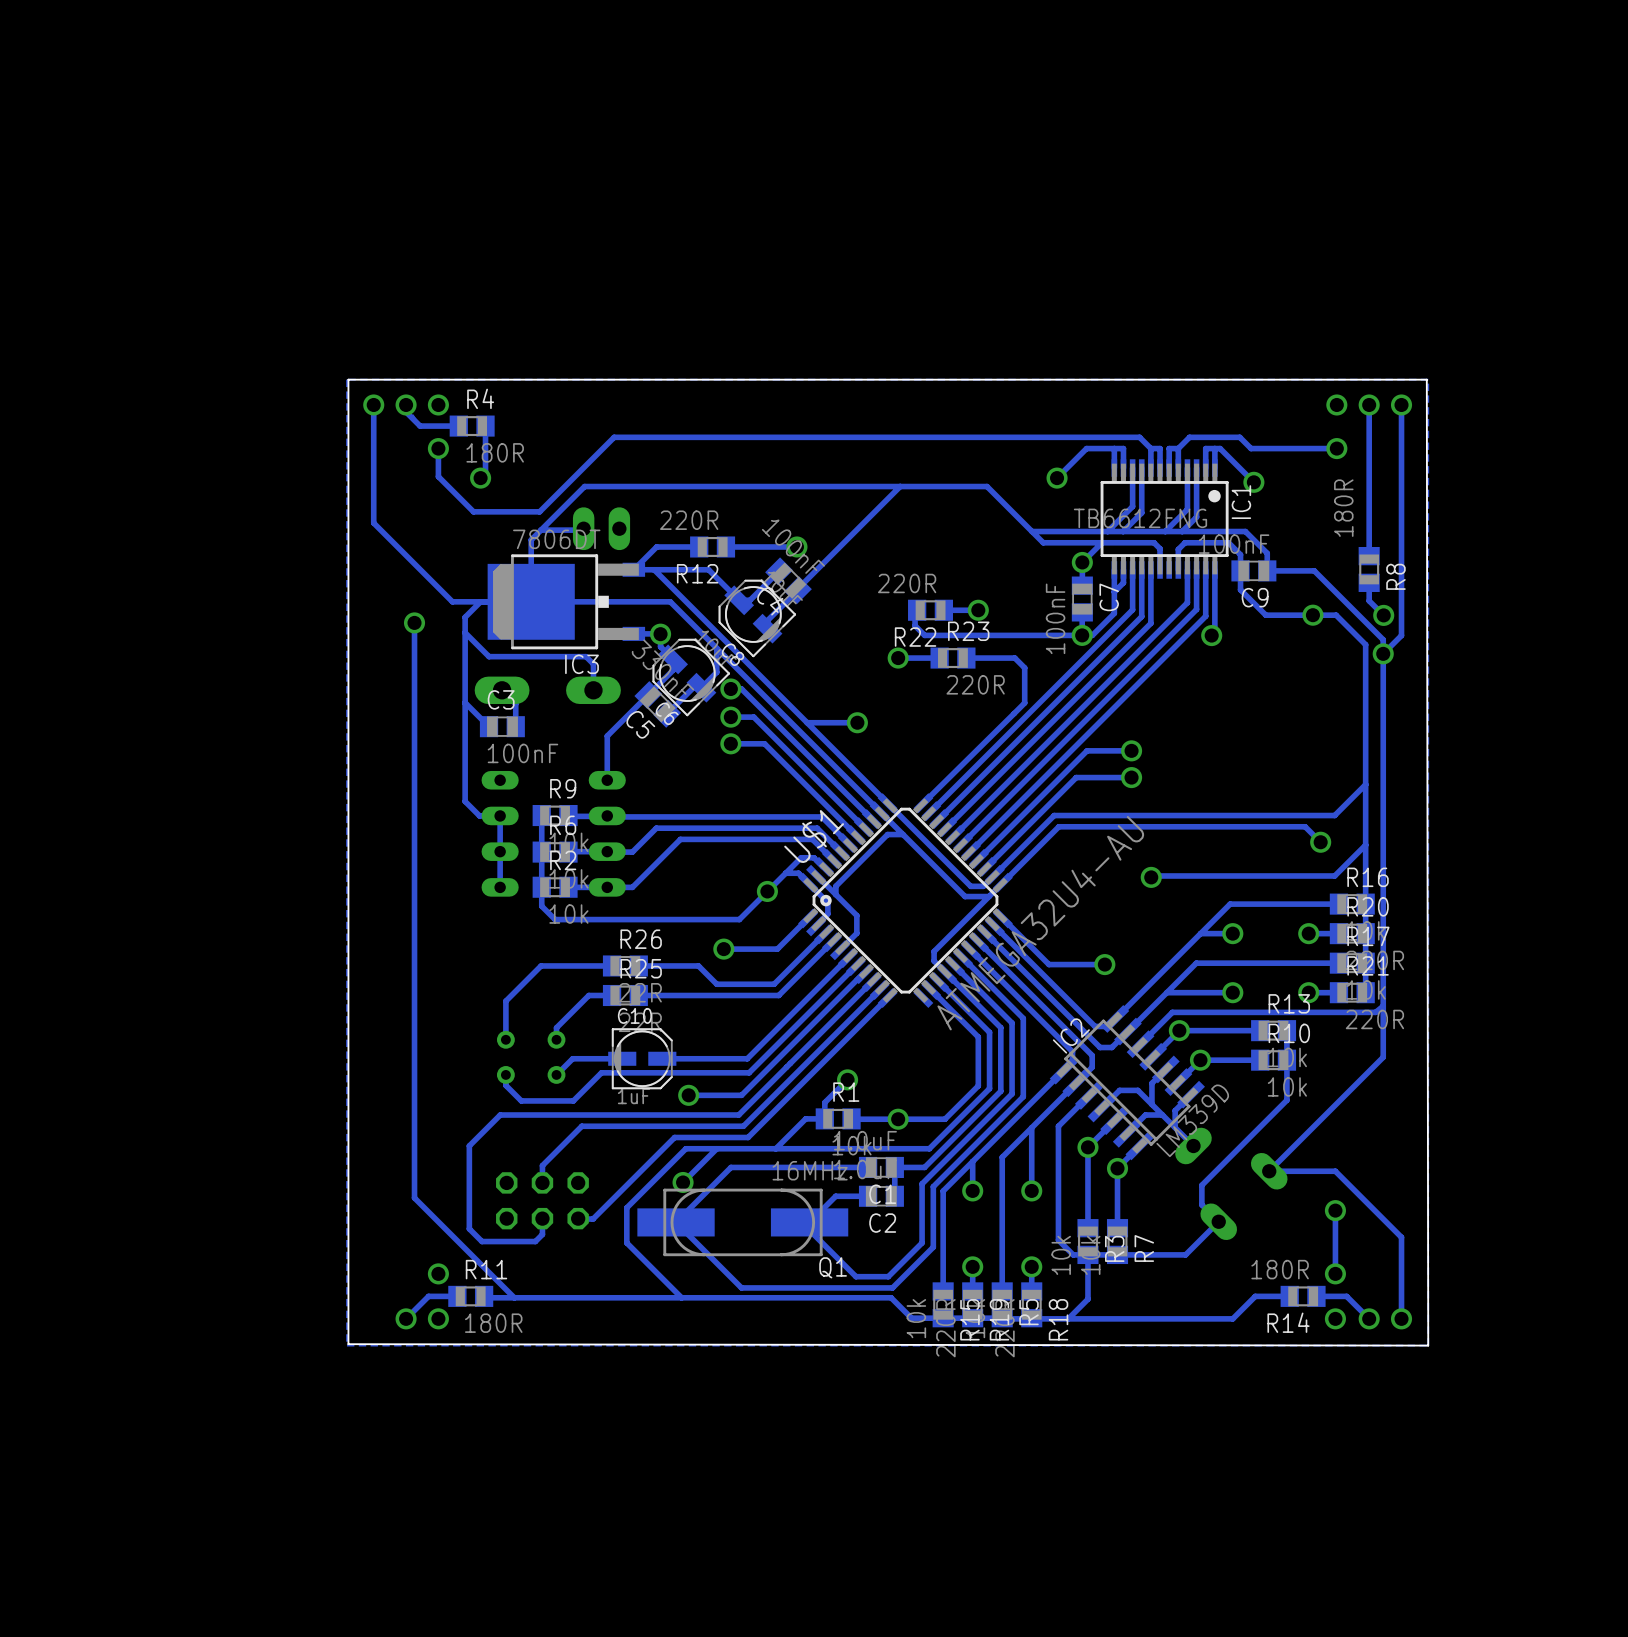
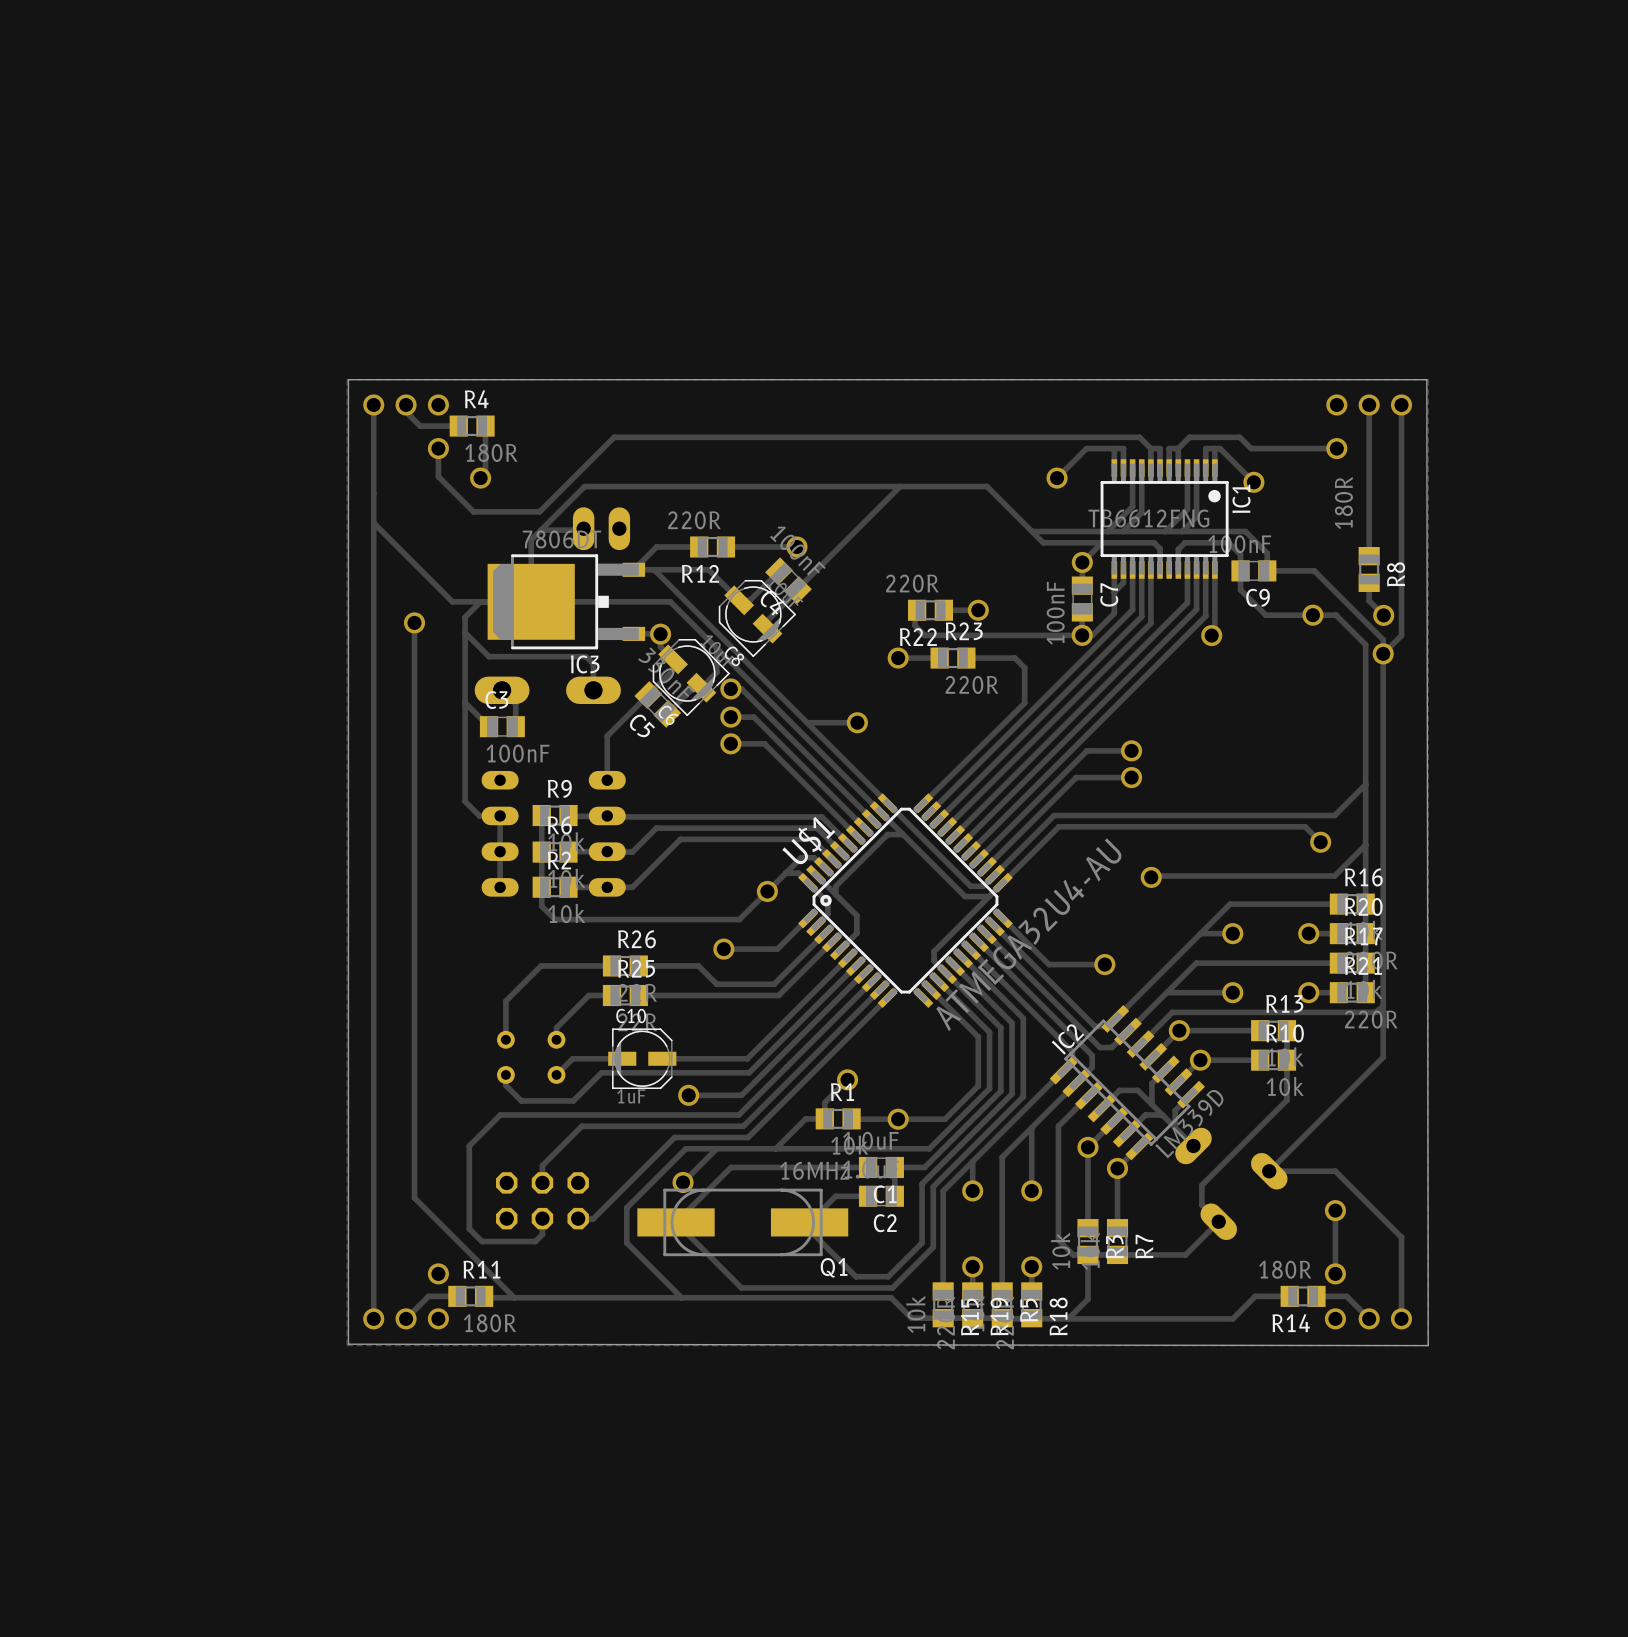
track: none -> (373, 523) (373, 1318)
via: none -> (373, 1318)

